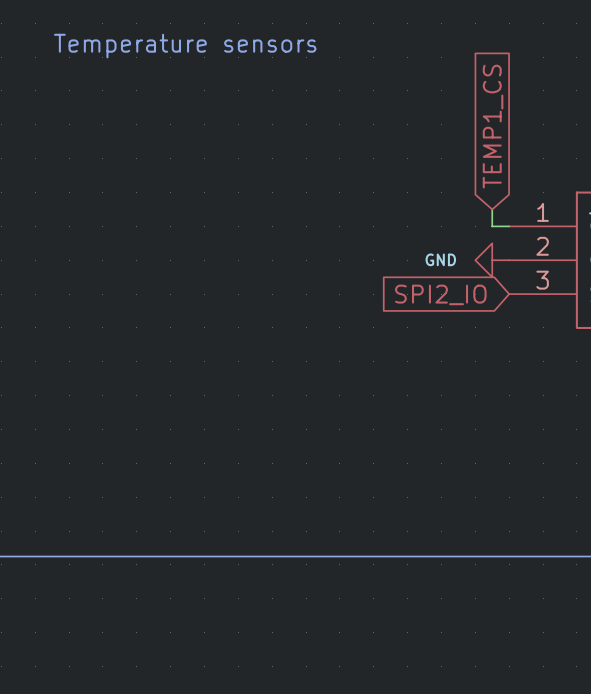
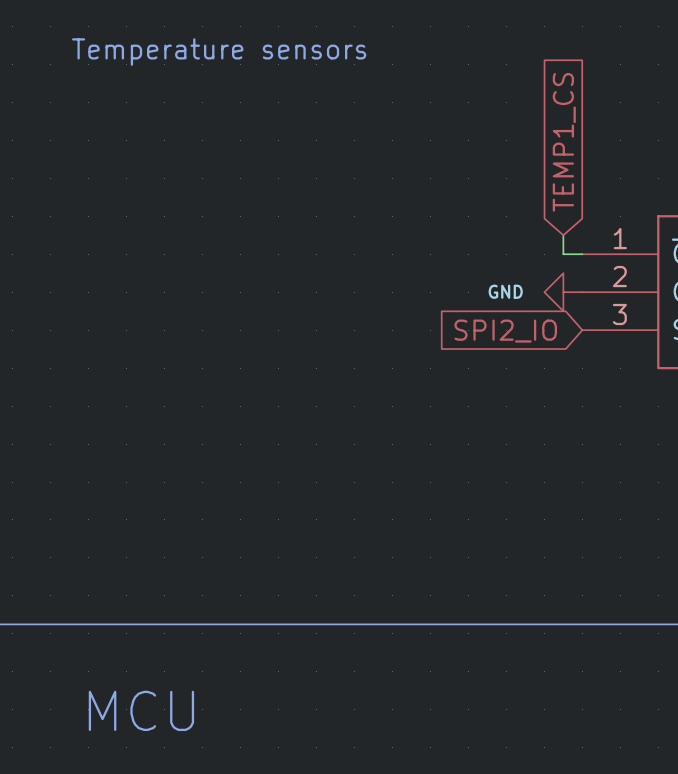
text: none -> MCU (141, 710)

